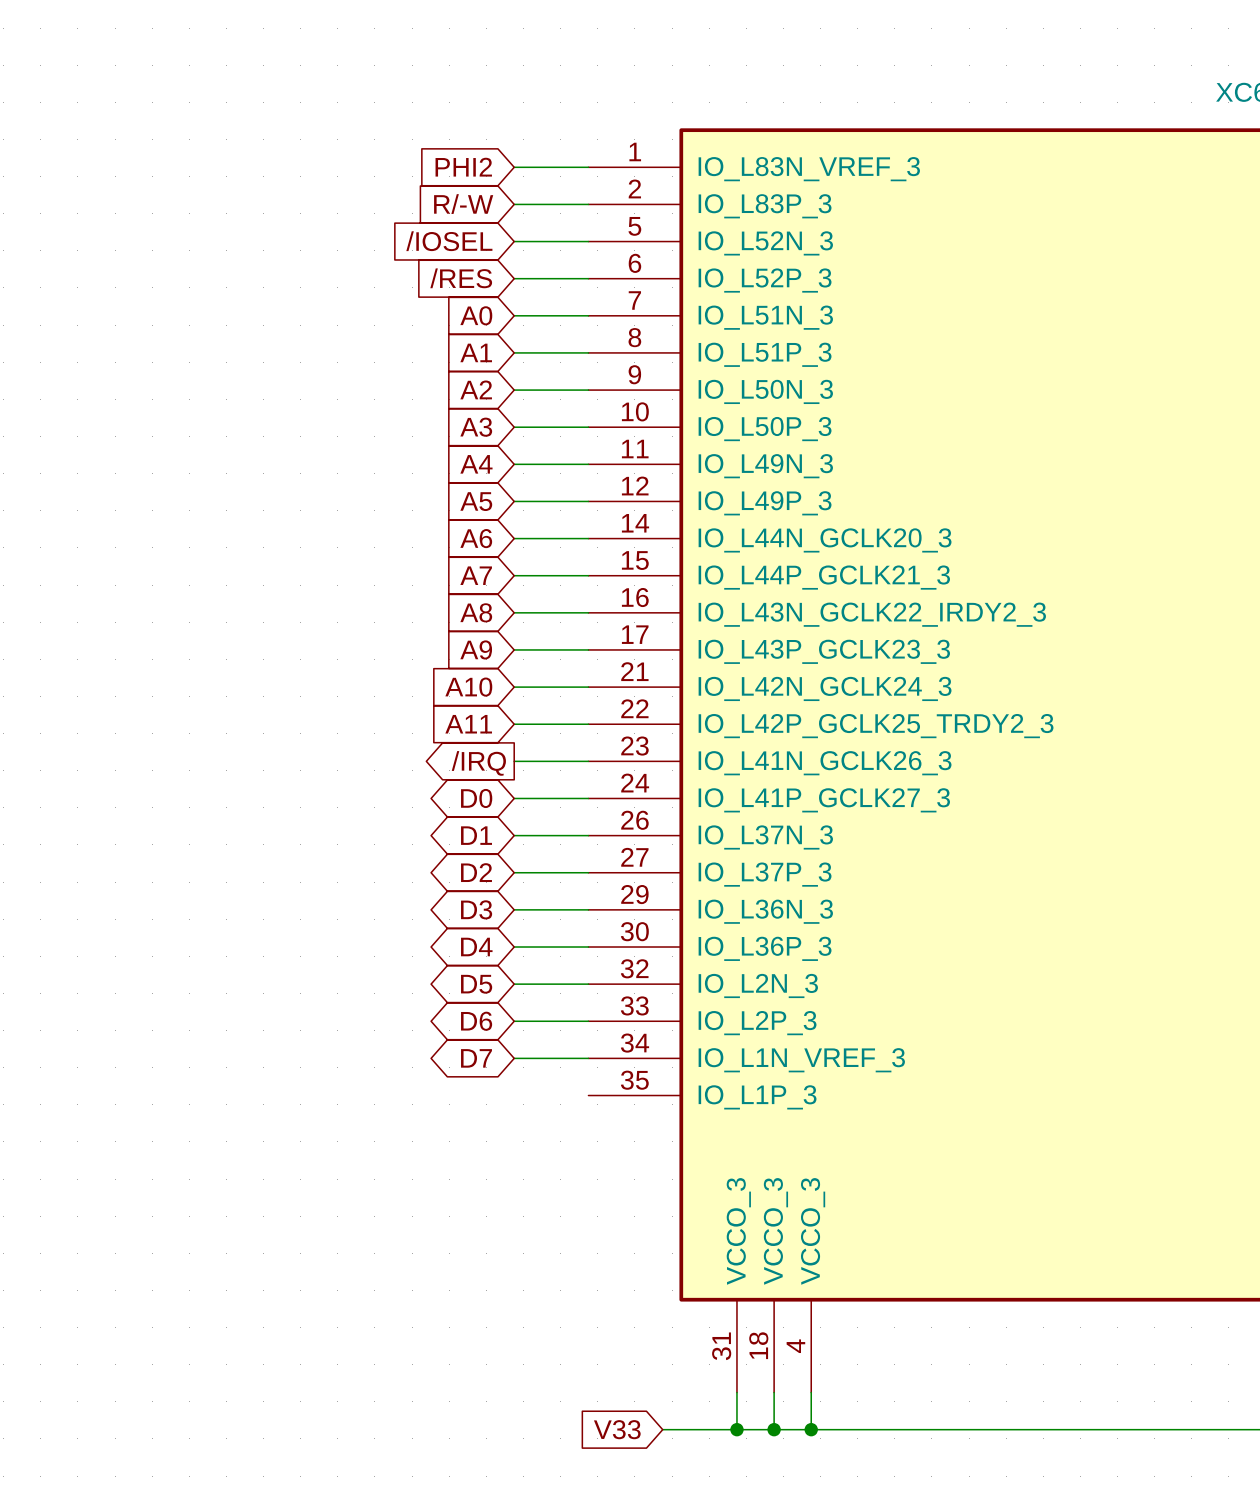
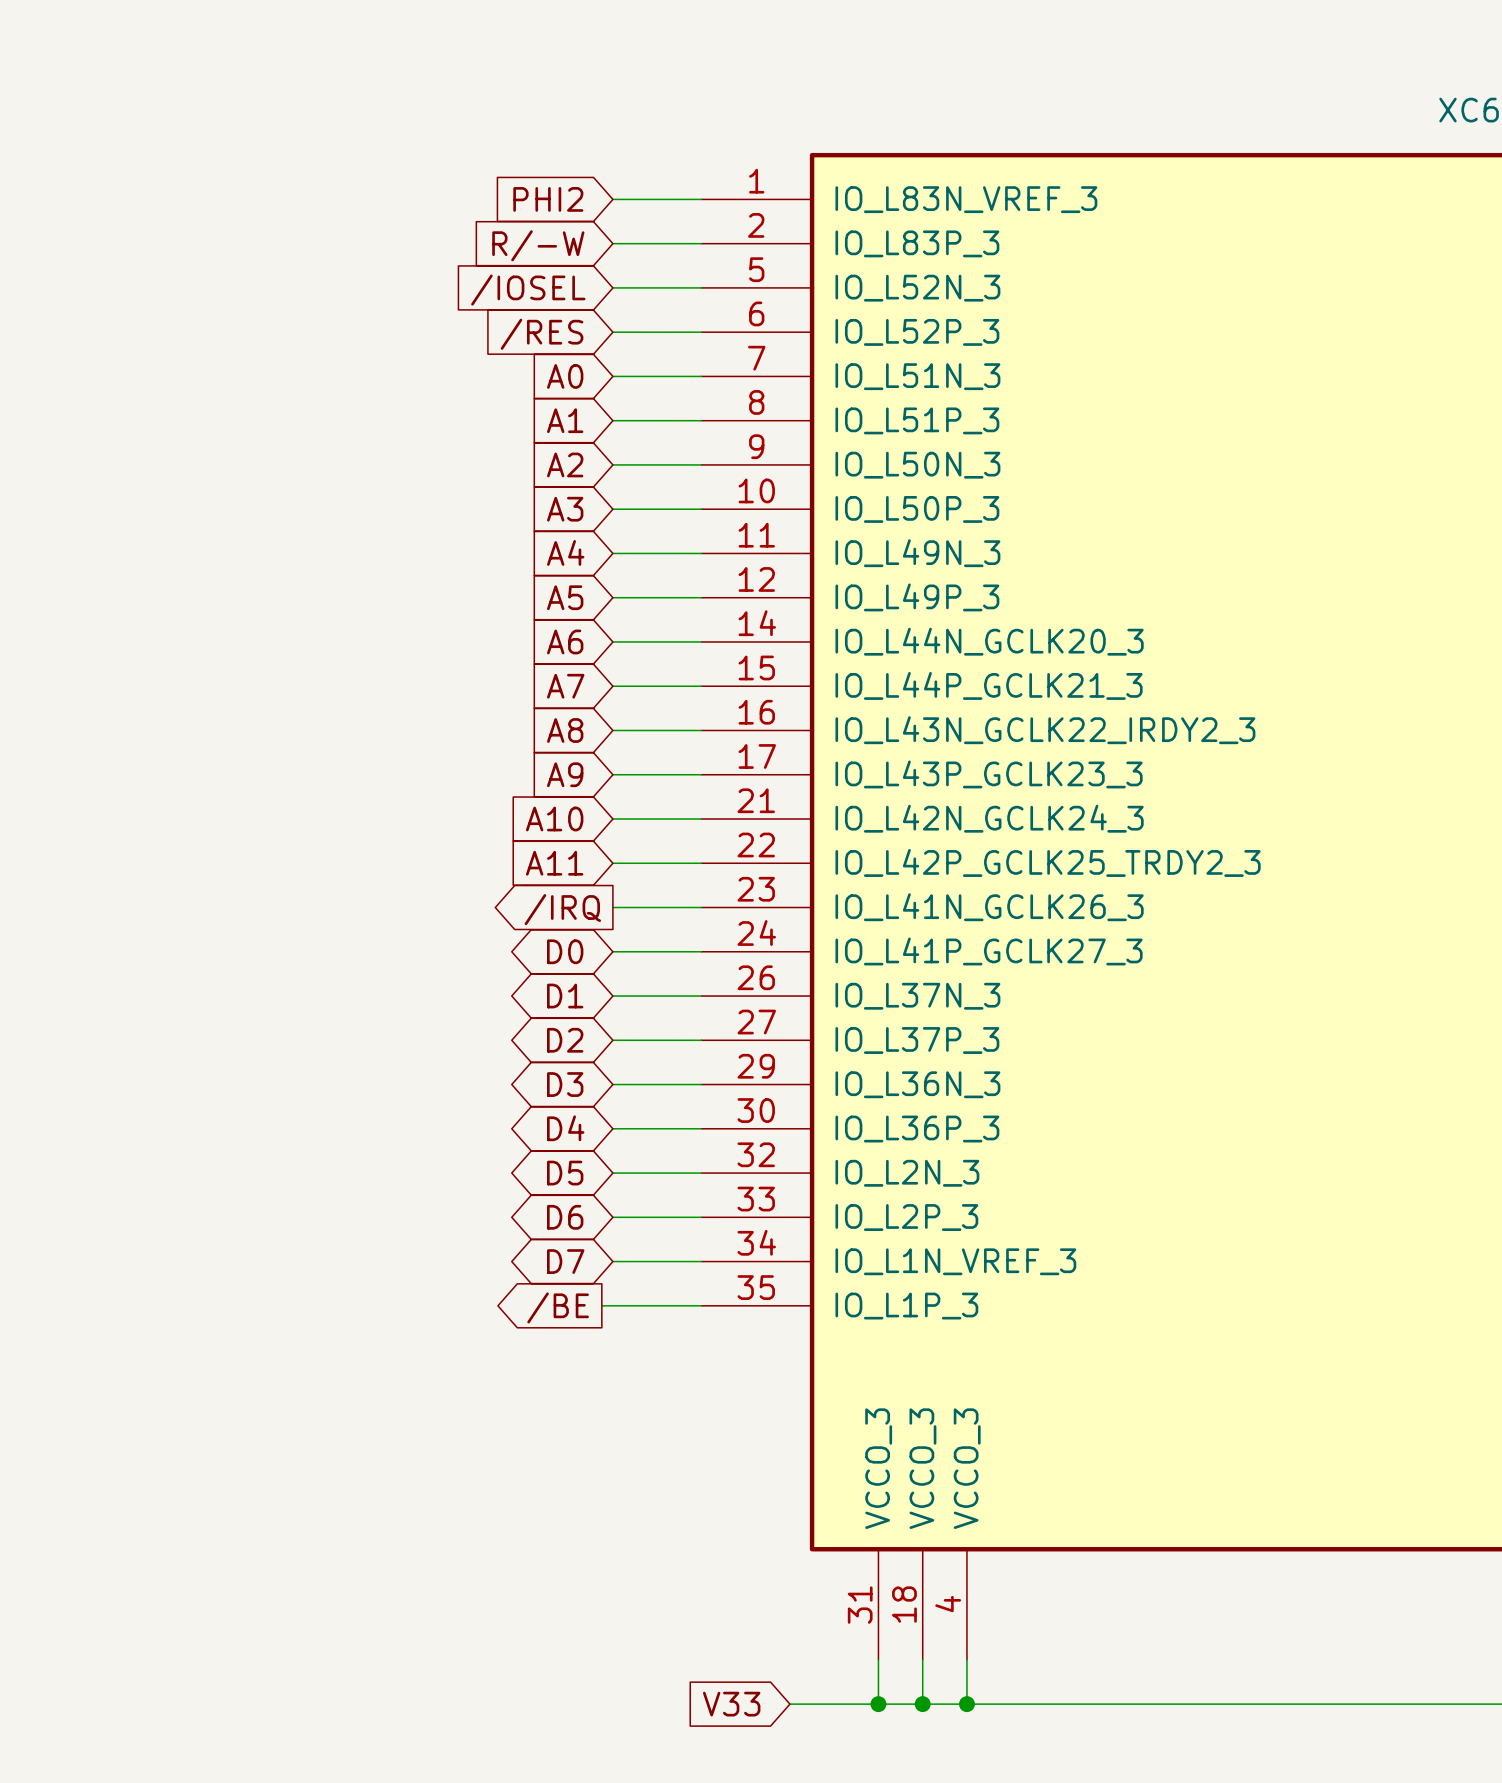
global label: none -> /BE (558, 1307)
wire: none -> (601, 1305) (701, 1305)

